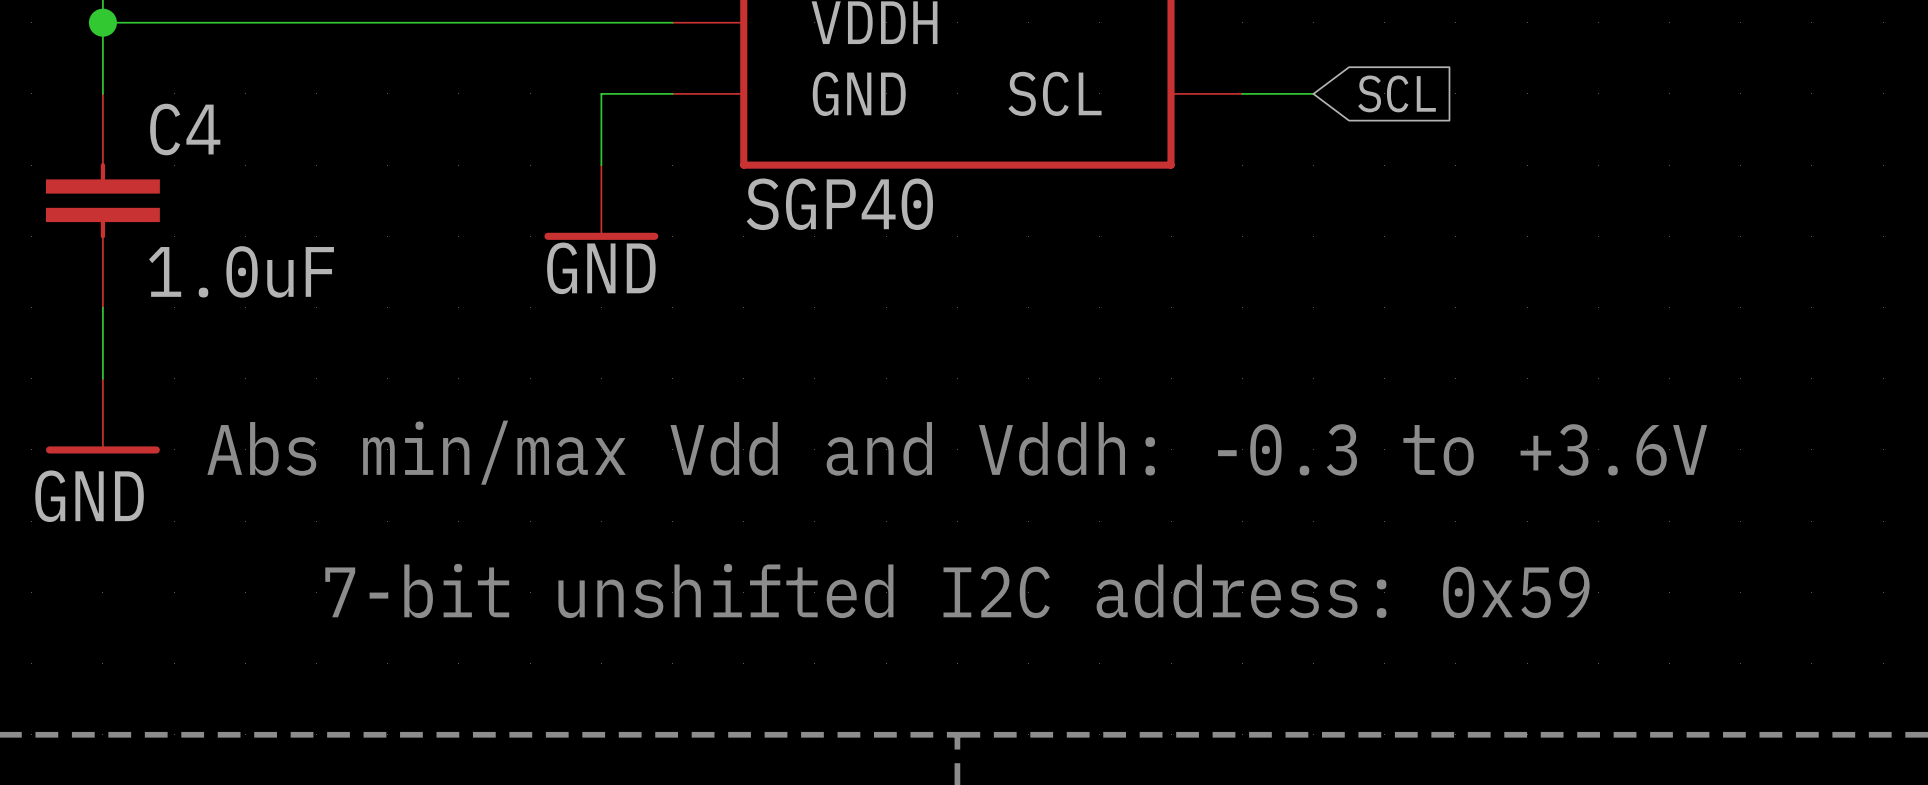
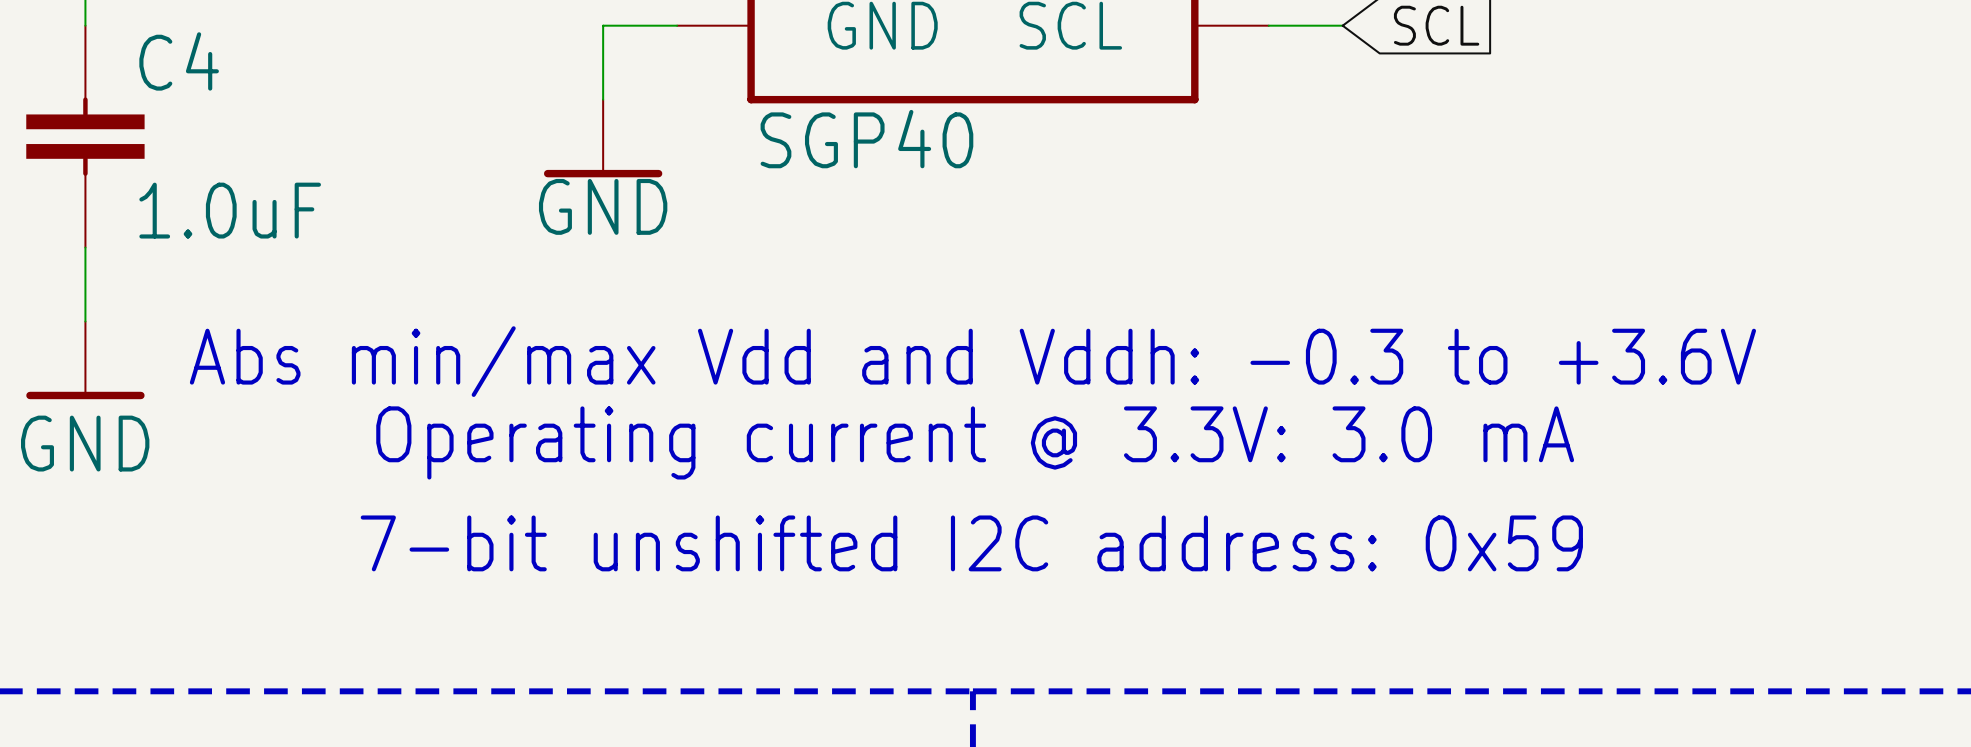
text position: Abs min/max Vdd and Vddh: -0.3 to +3.6V (957, 452) -> Abs min/max Vdd and Vddh: -0.3 to +3.6V (972, 361)
text: none -> Operating current @ 3.3V: 3.0 mA (975, 442)

